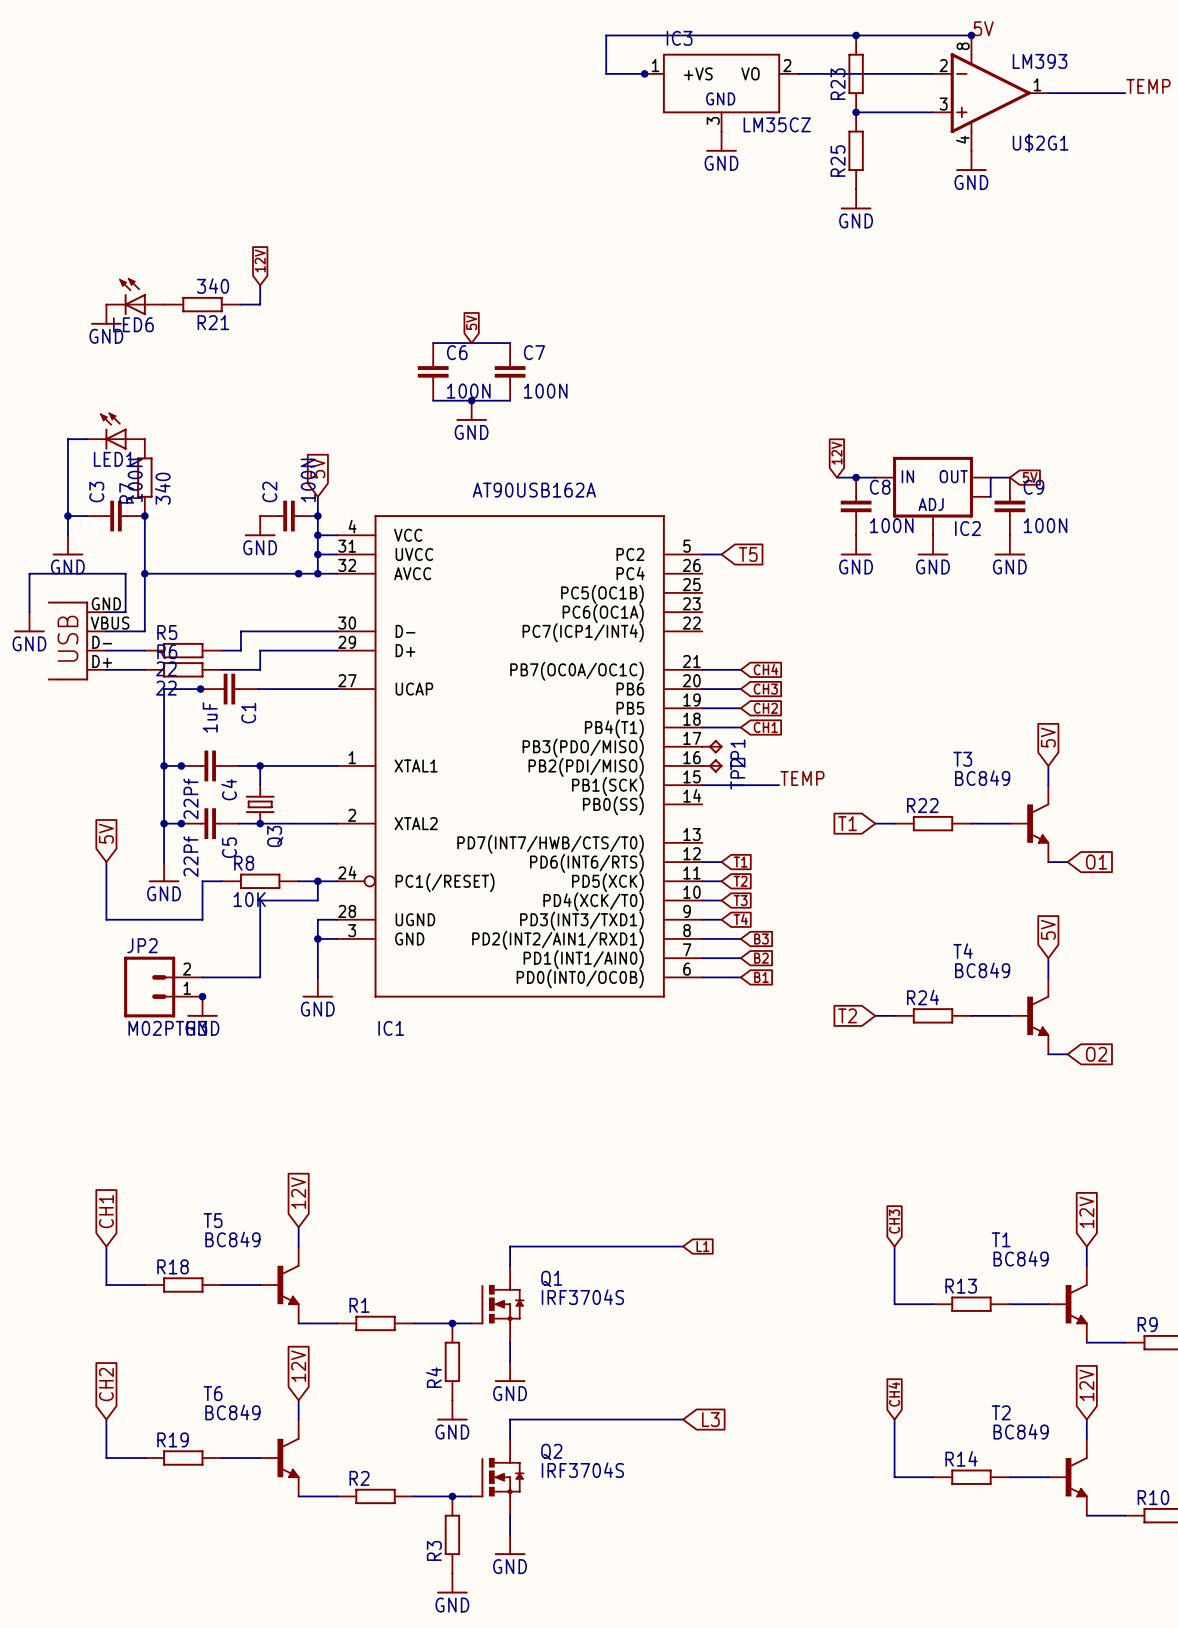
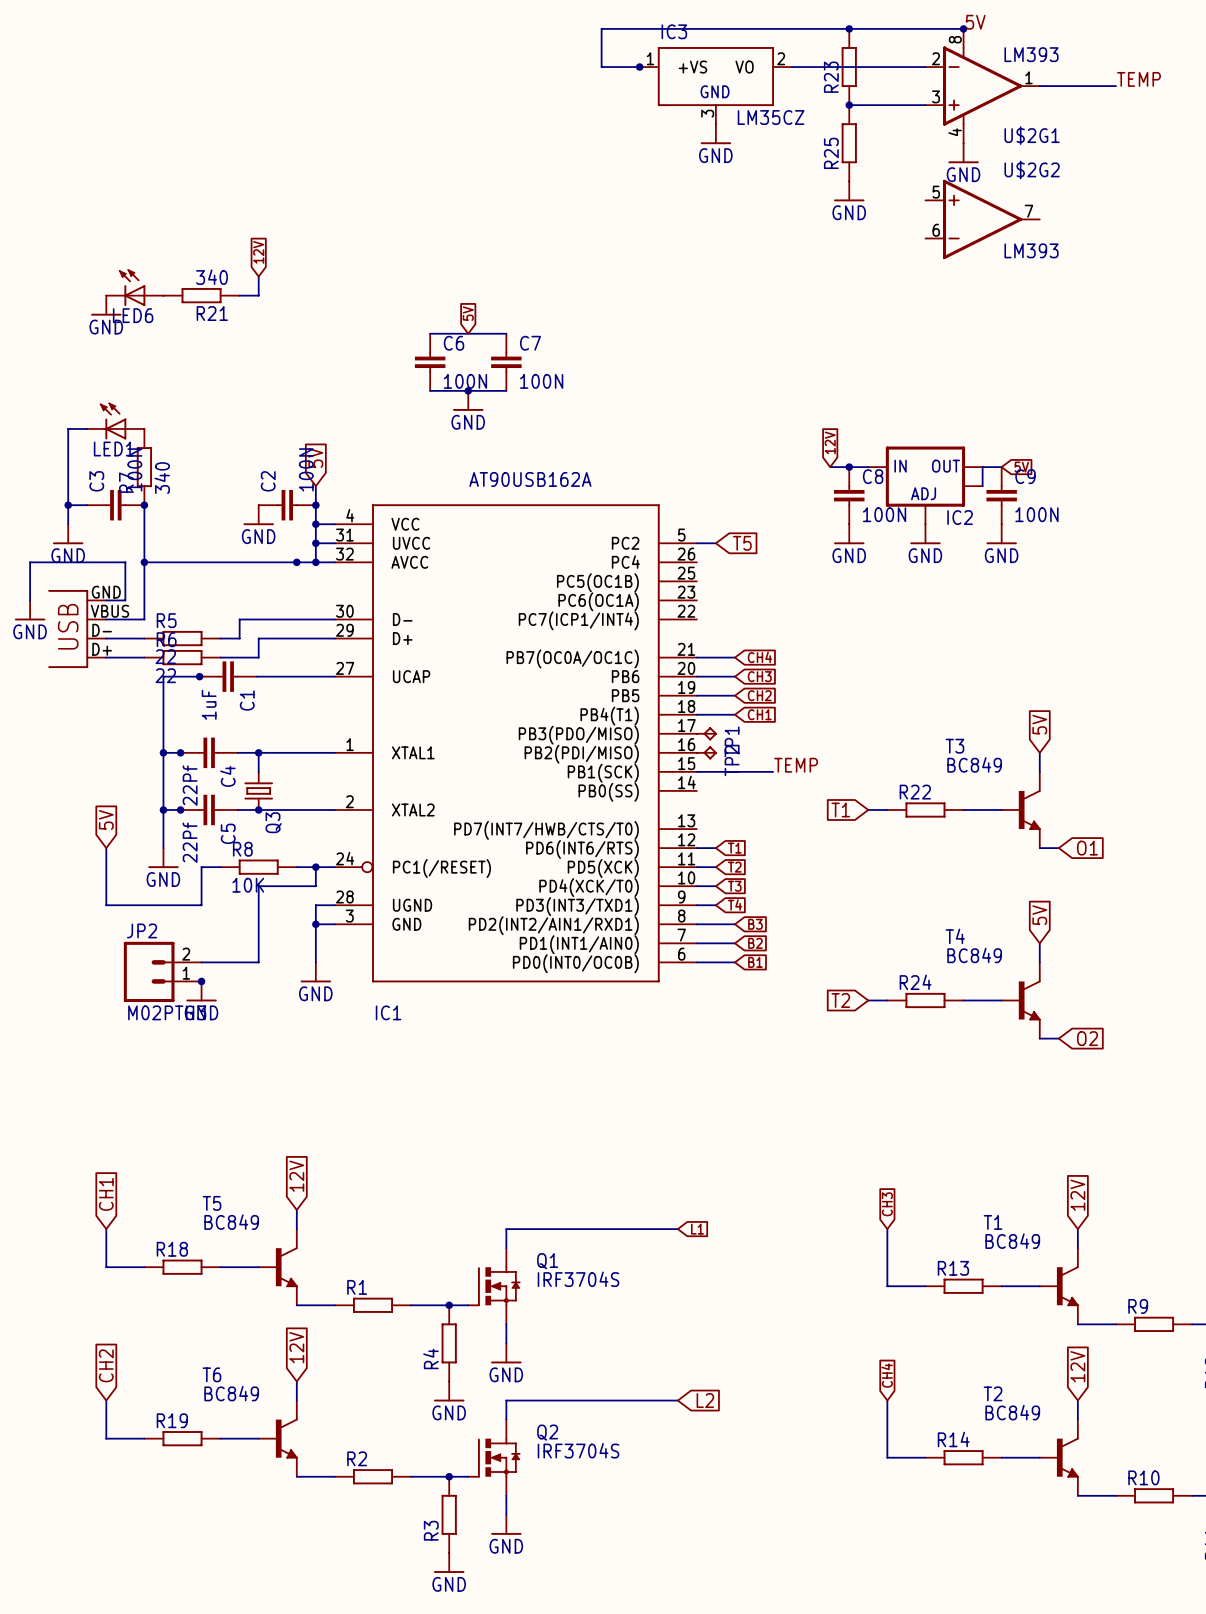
U$2G2: none -> LM393 (982, 219)
global label: L3 (710, 1419) -> L2 (705, 1400)

